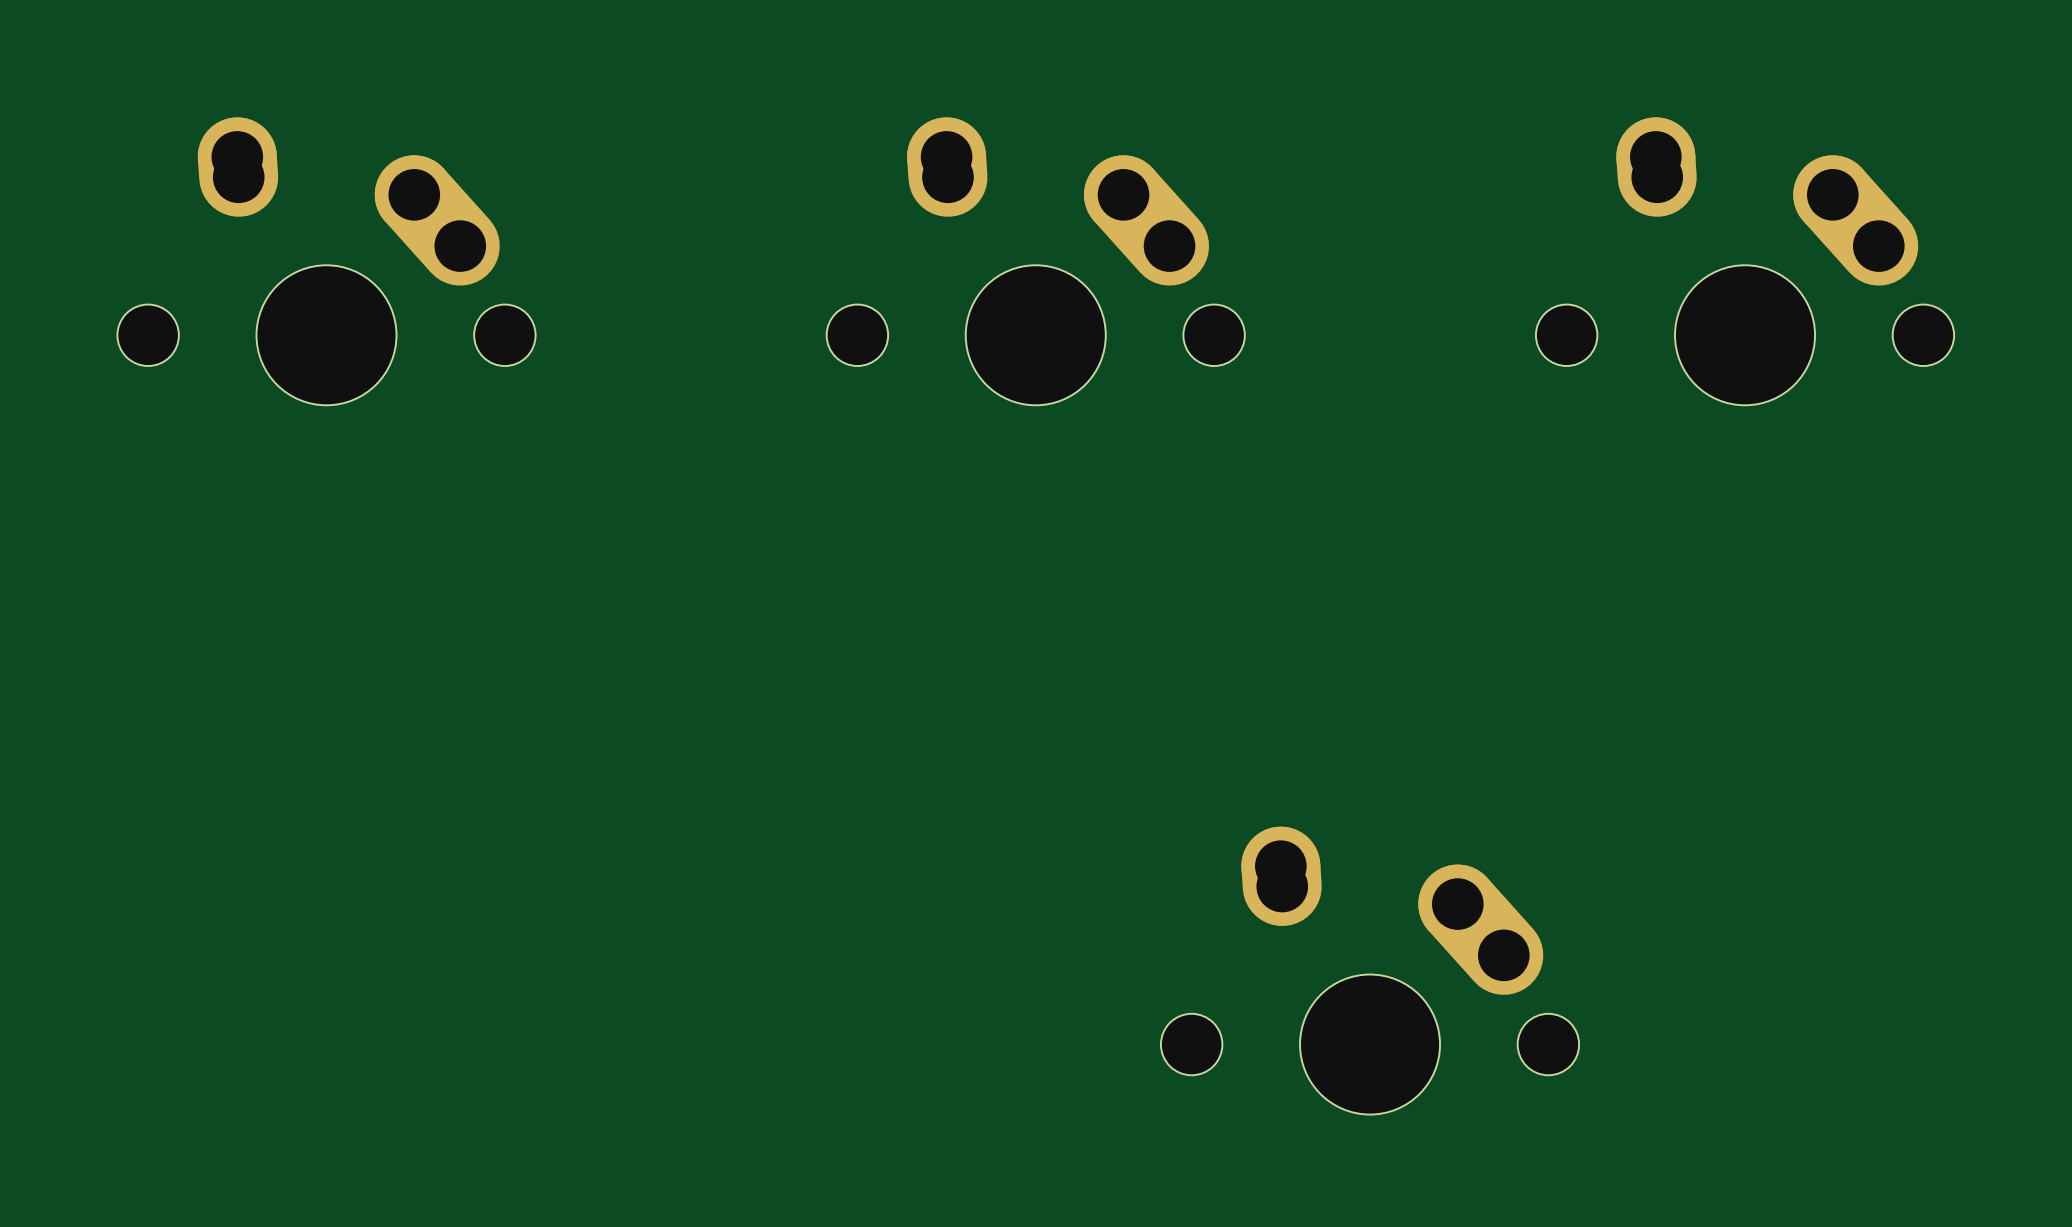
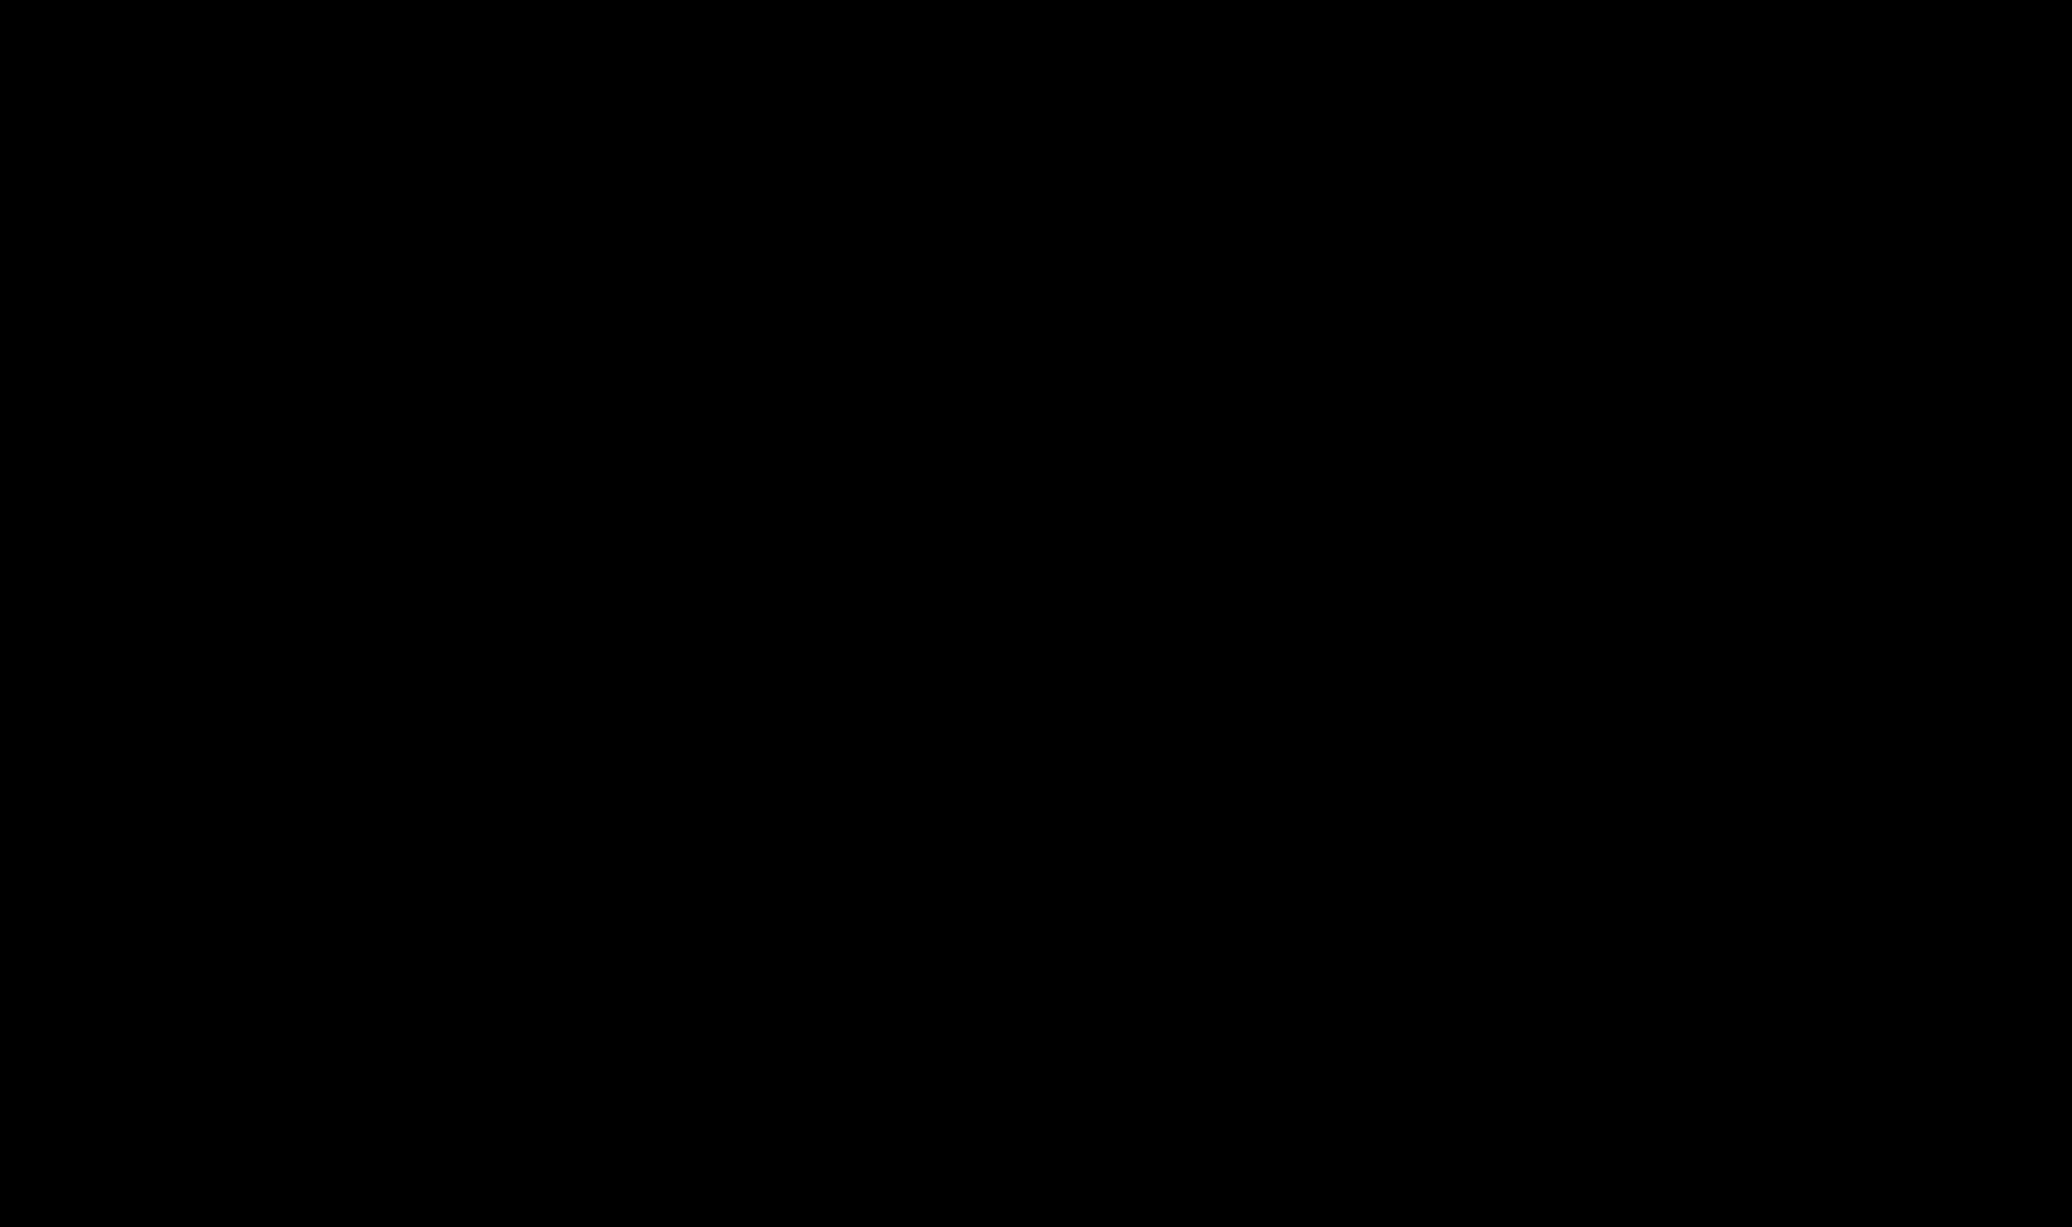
part: (326, 261) -> none
part: (1035, 261) -> none
part: (1745, 261) -> none
part: (1370, 970) -> none

